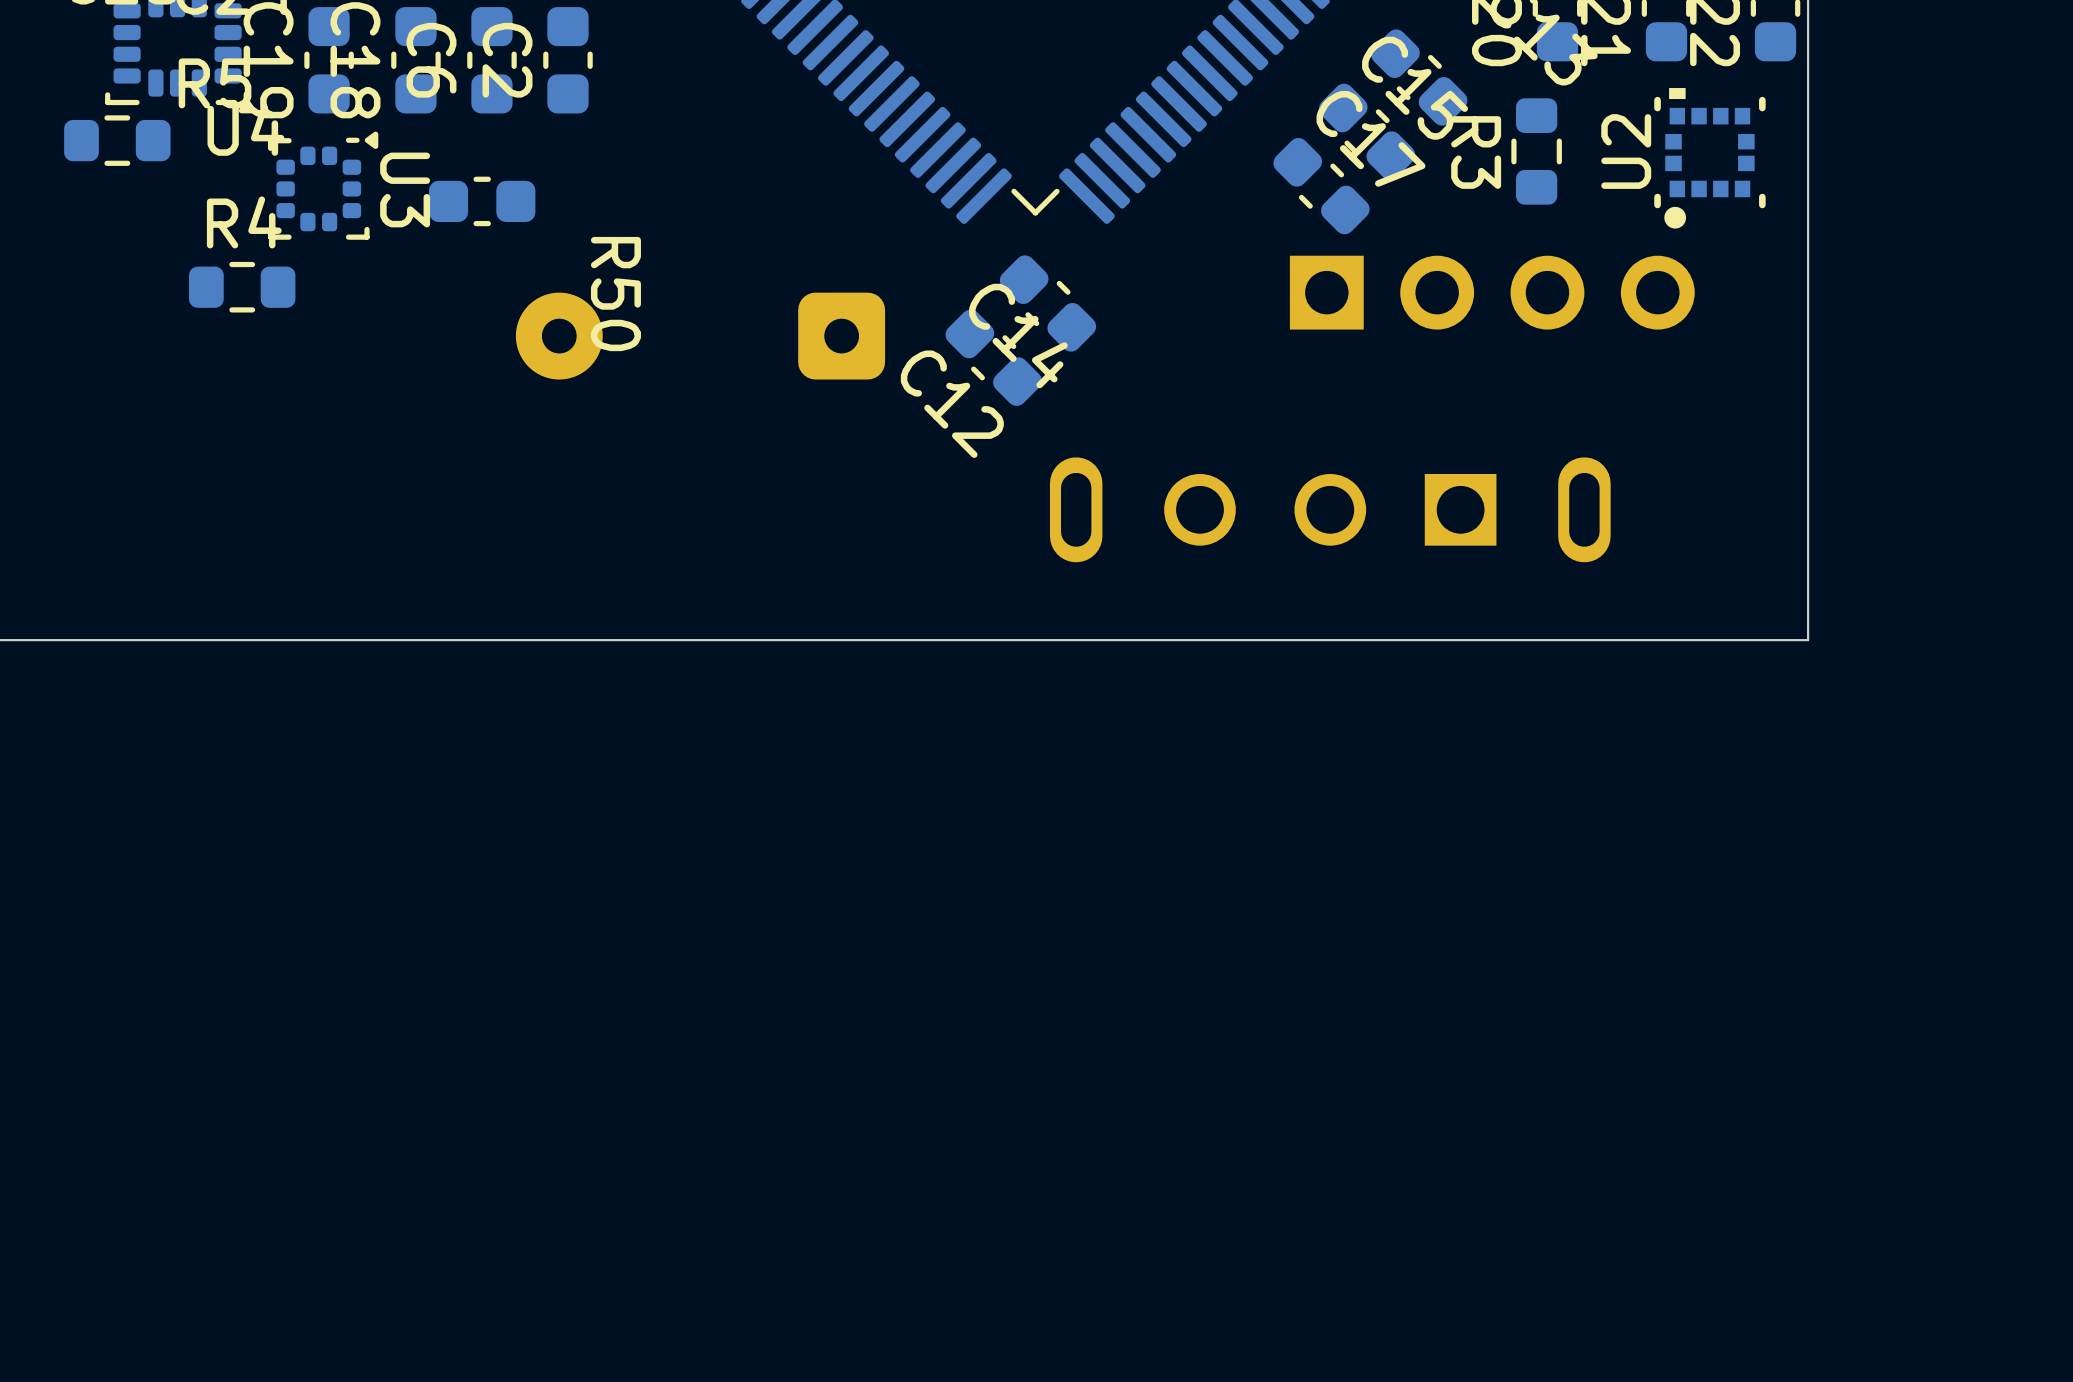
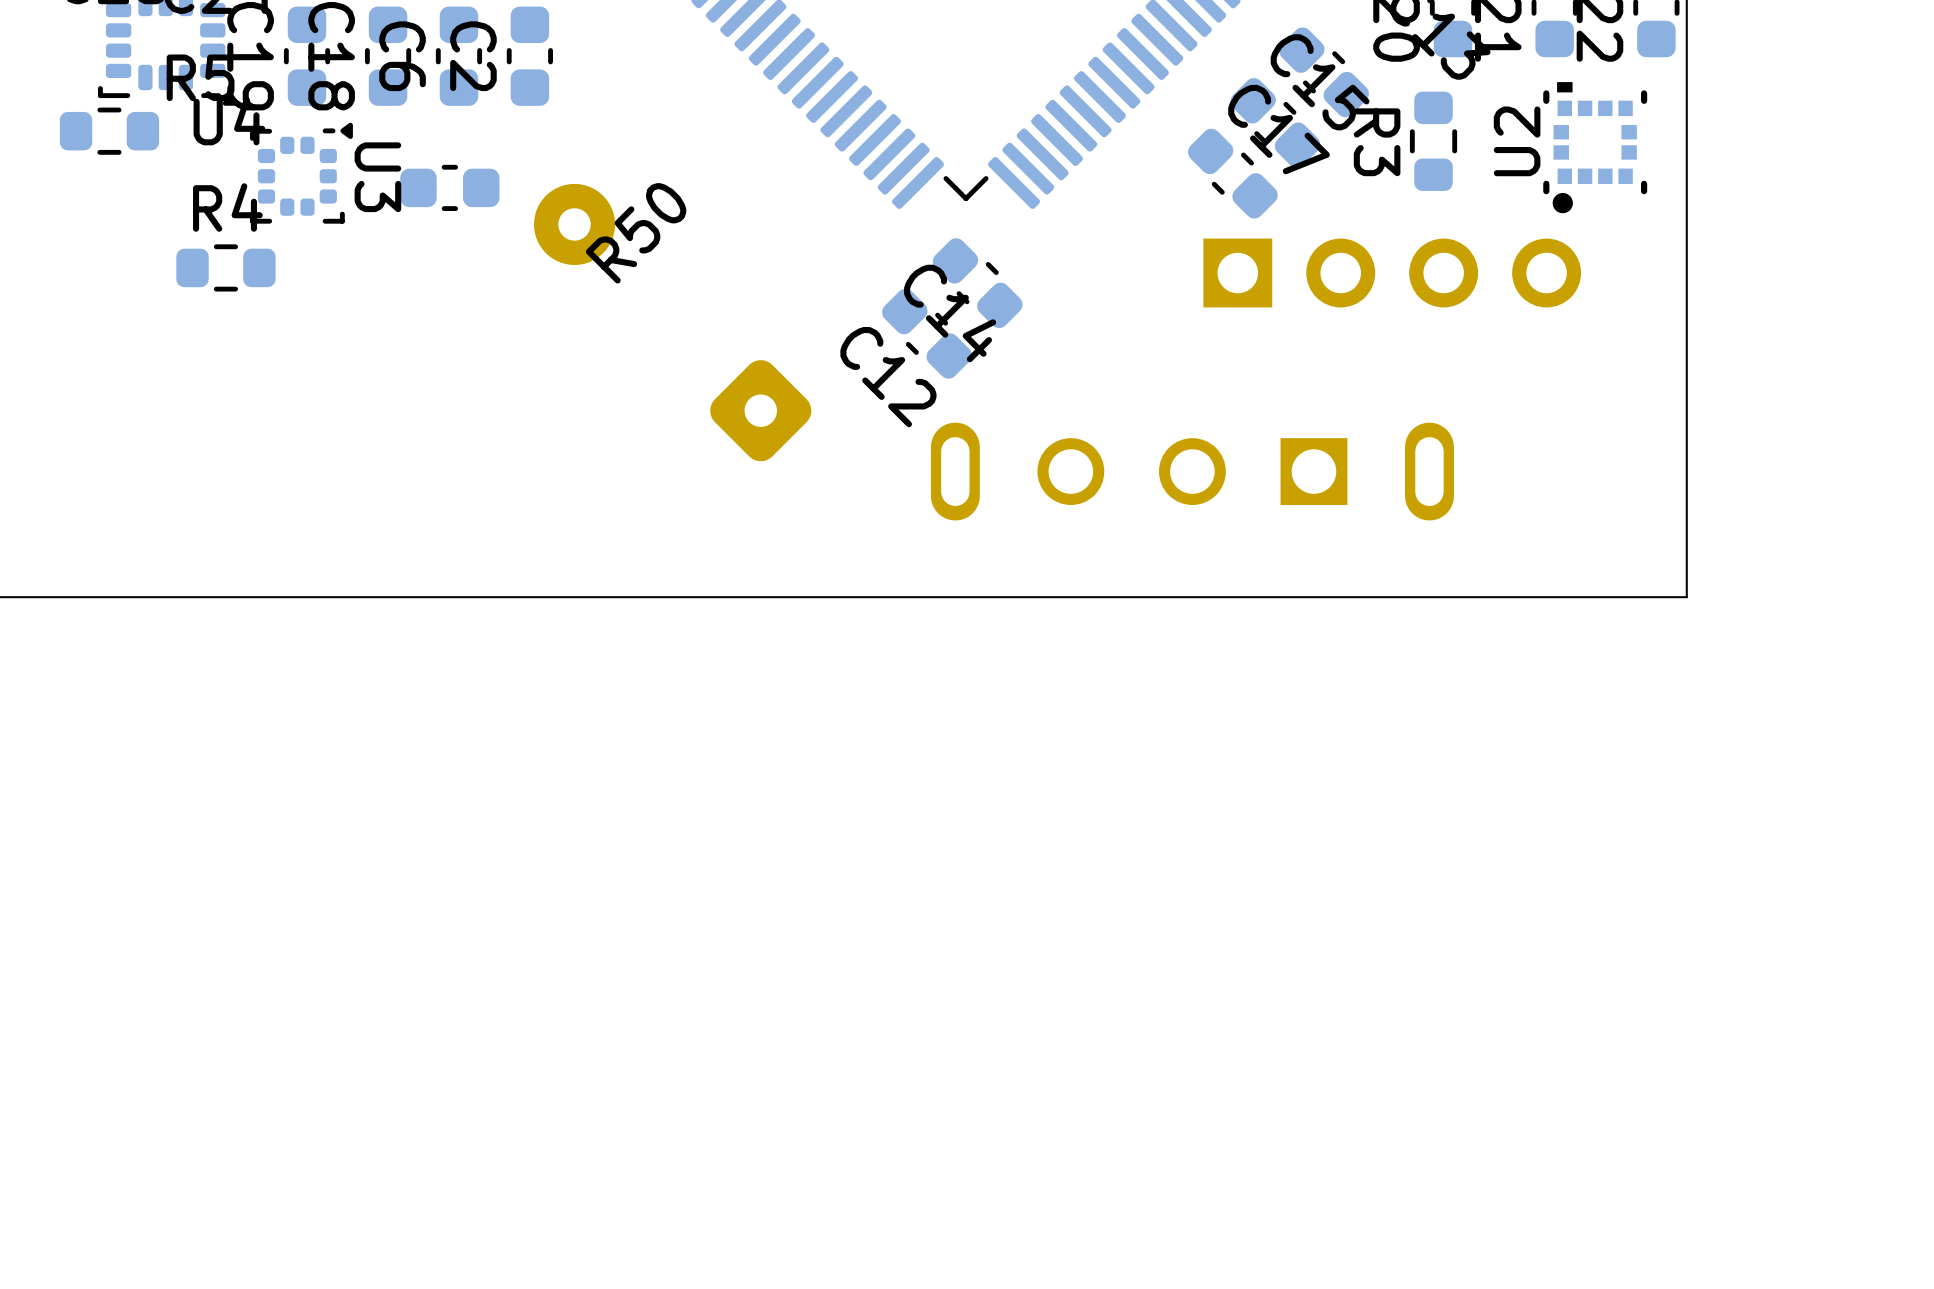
R50 rotation: 0° (700, 336) -> 45° clockwise (672, 322)
part position: (1330, 509) -> (1192, 471)

